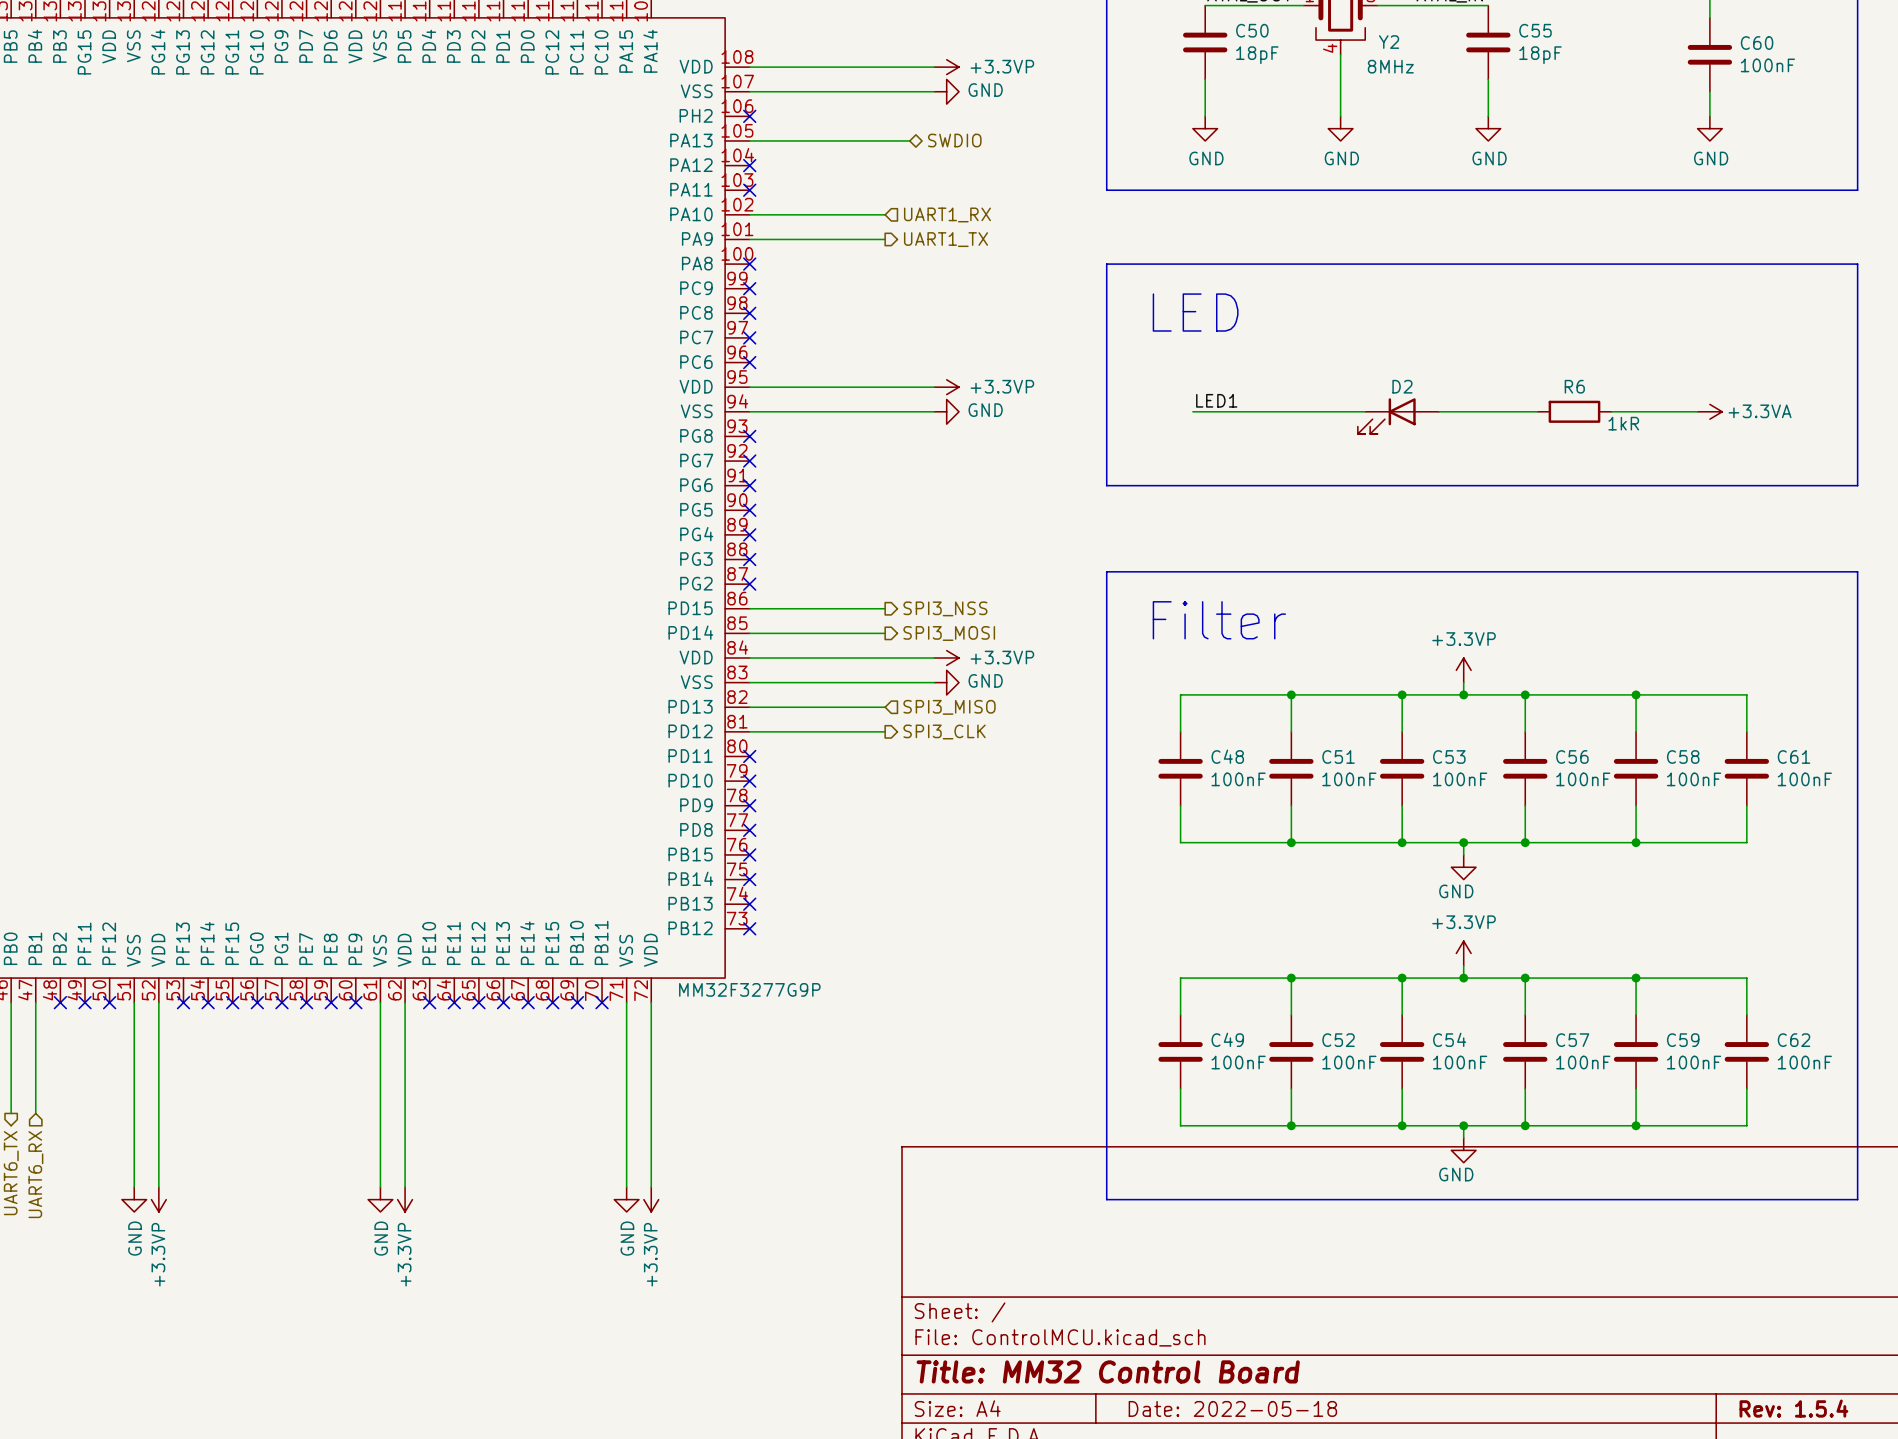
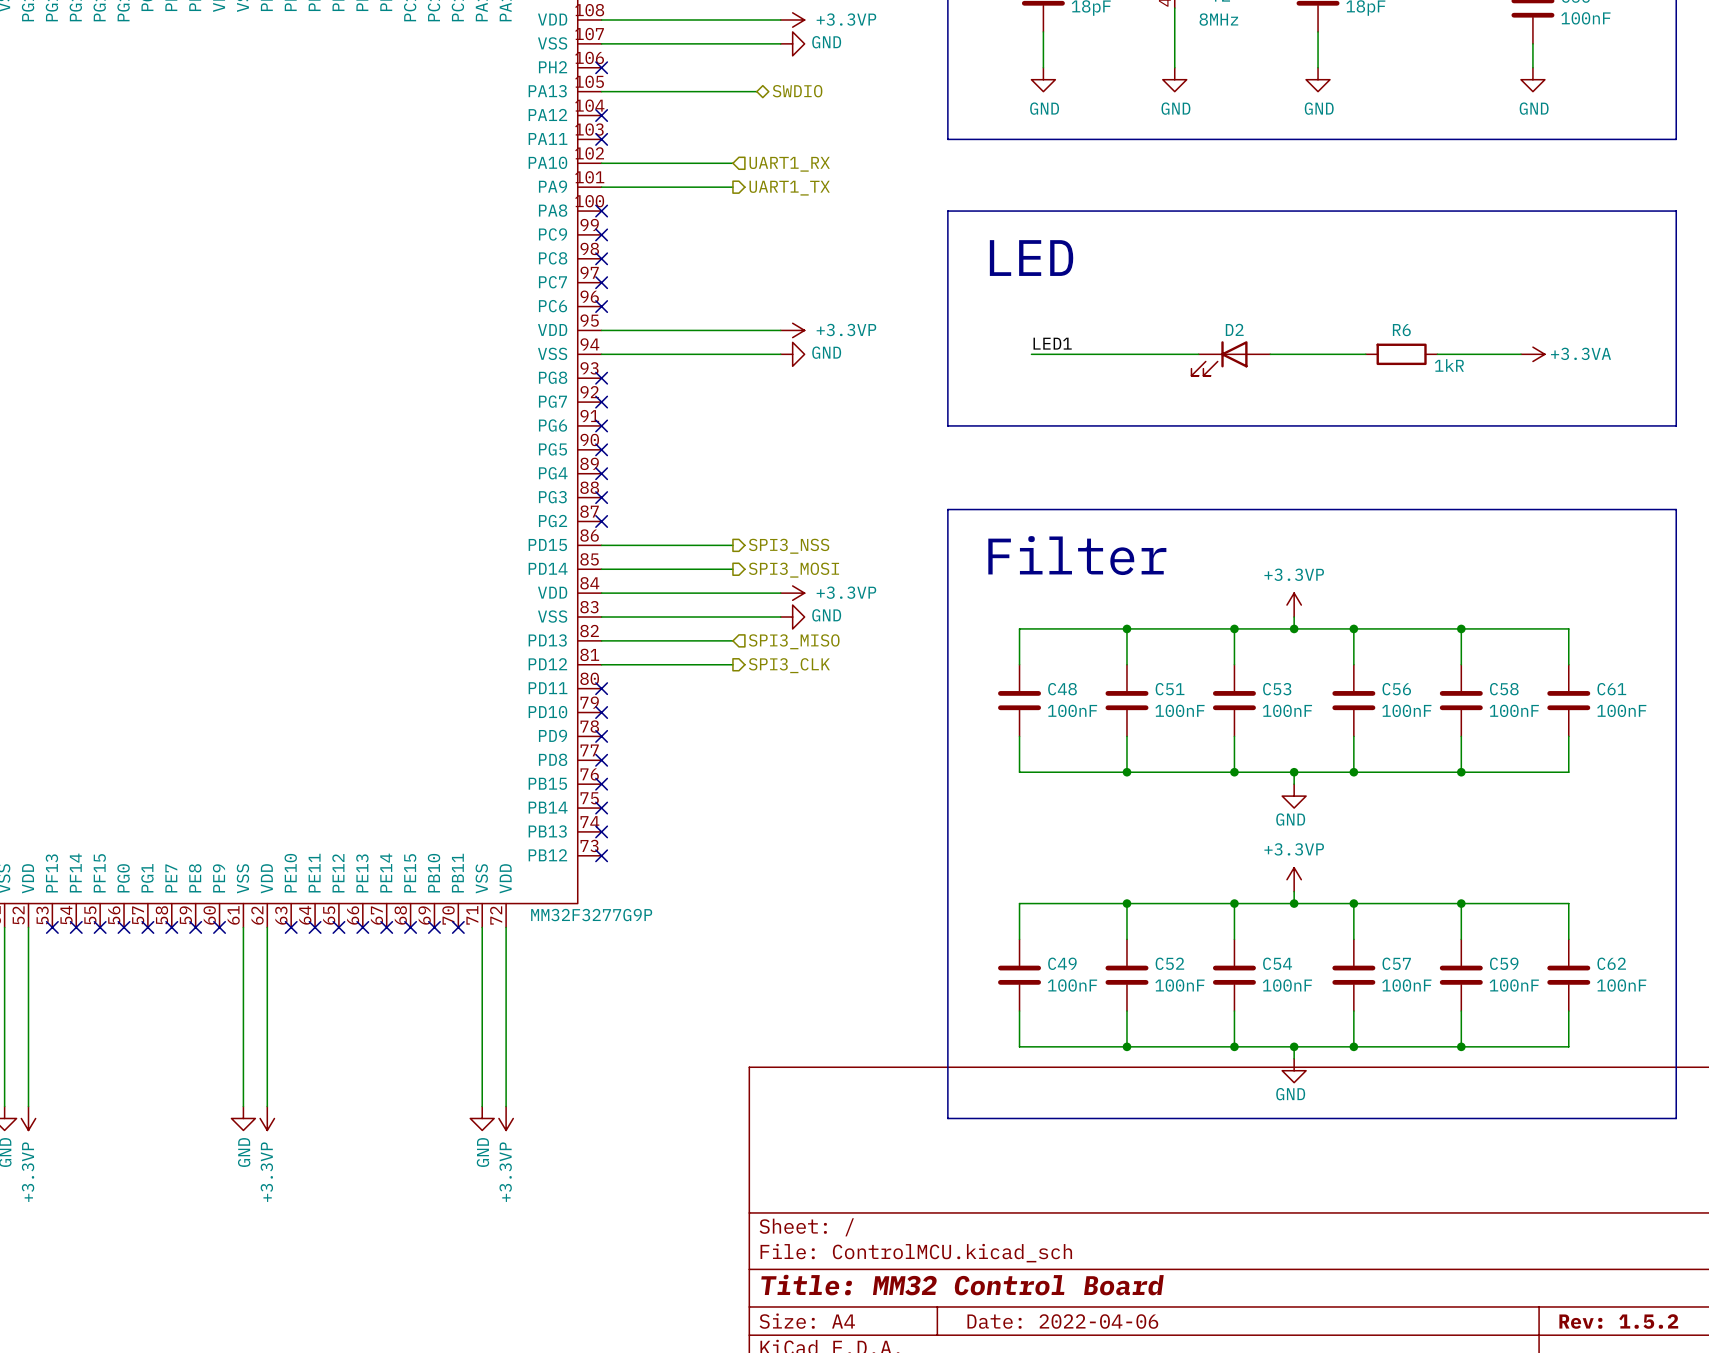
title block: Date: 2022-05-18 (1232, 1408) -> Date: 2022-04-06 (1062, 1321)
title block: Rev: 1.5.4 (1793, 1408) -> Rev: 1.5.2 (1618, 1321)

